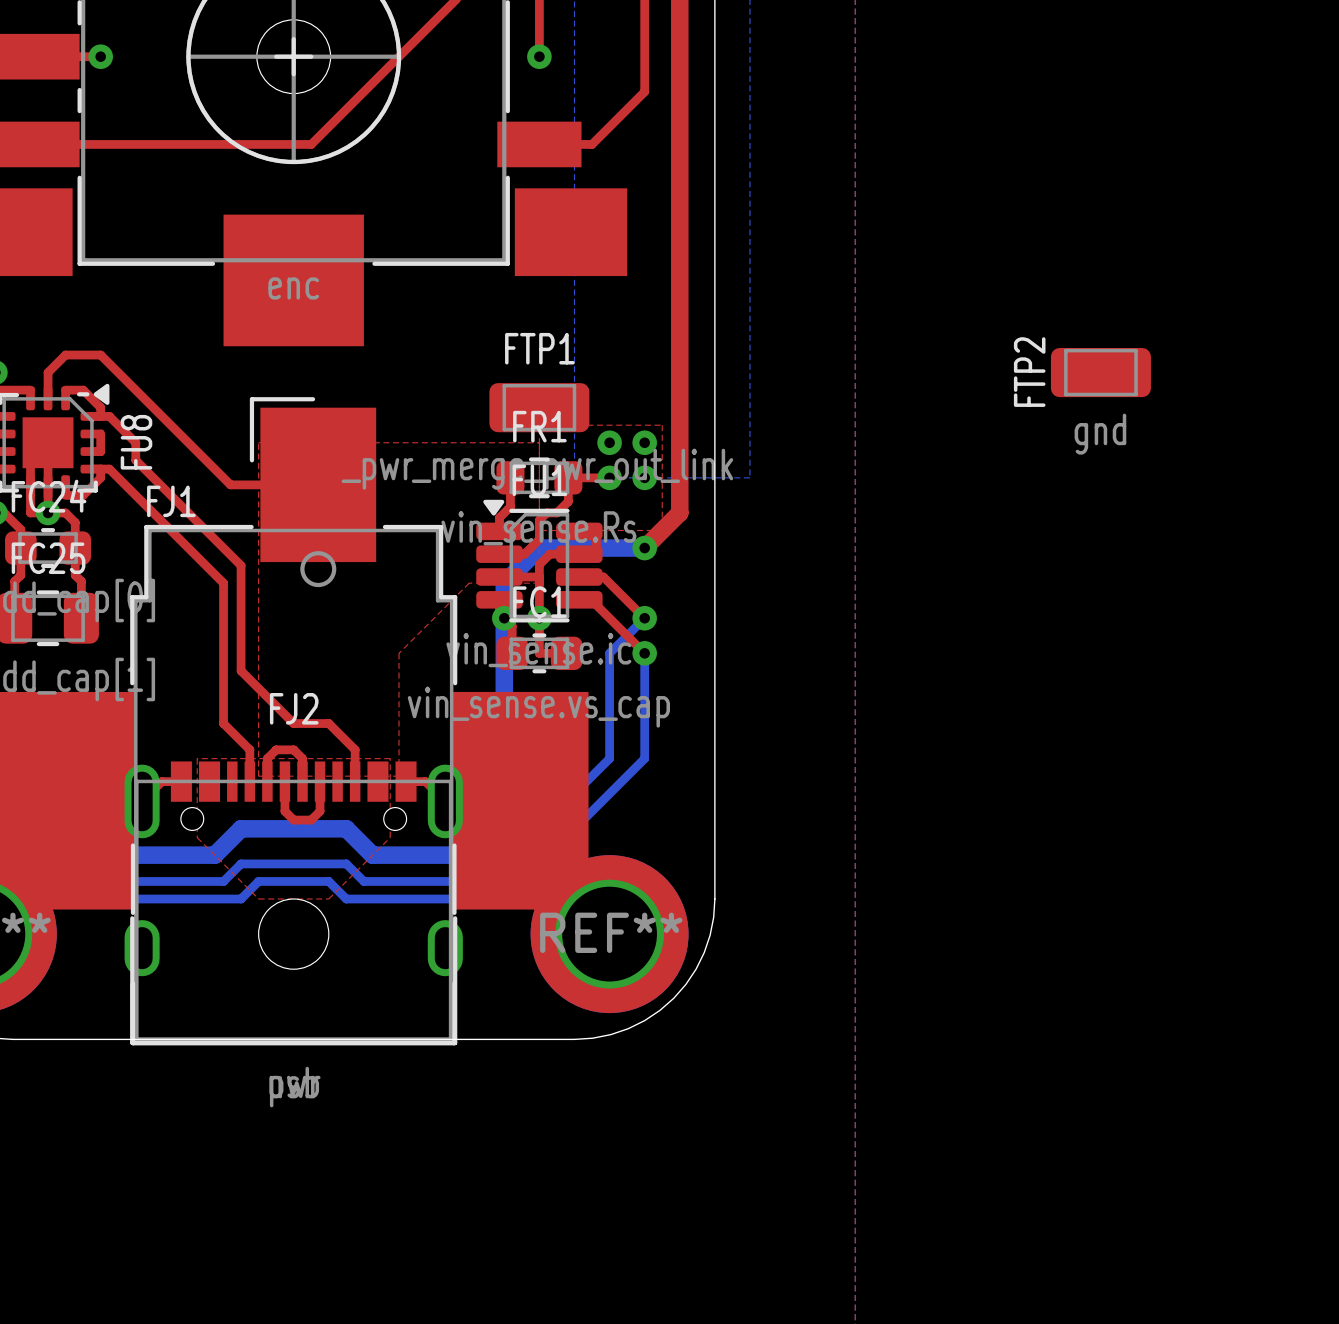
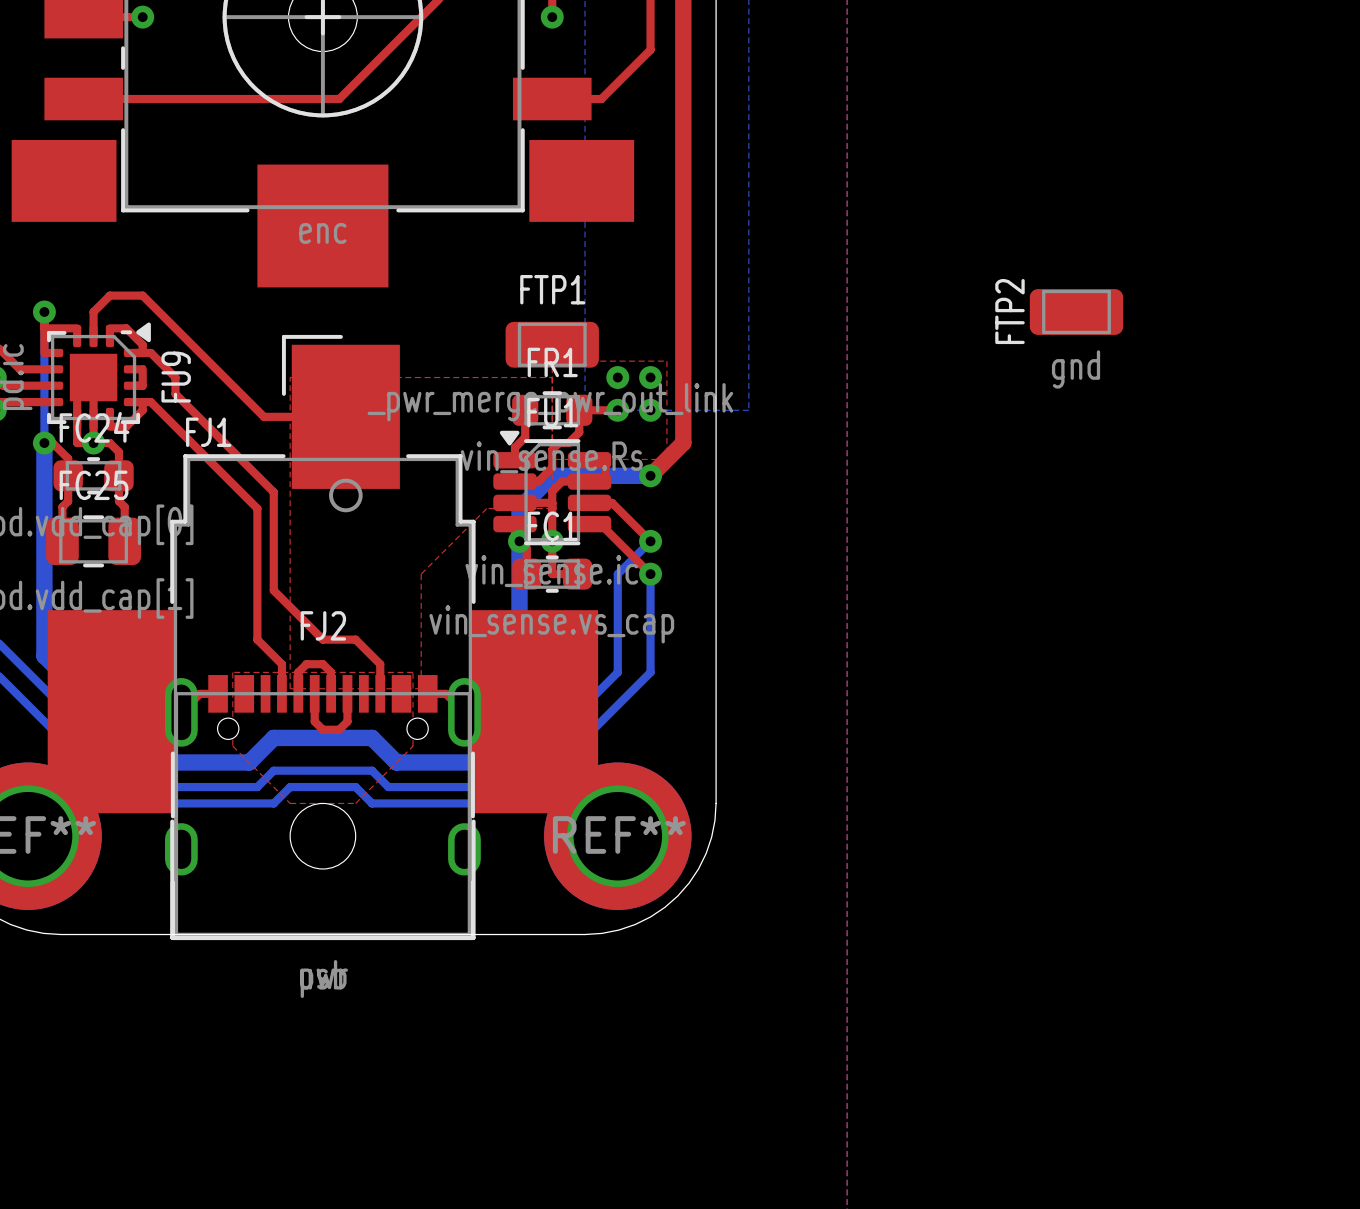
FU8 name: FU8 (136, 442) -> FU9 (176, 377)

